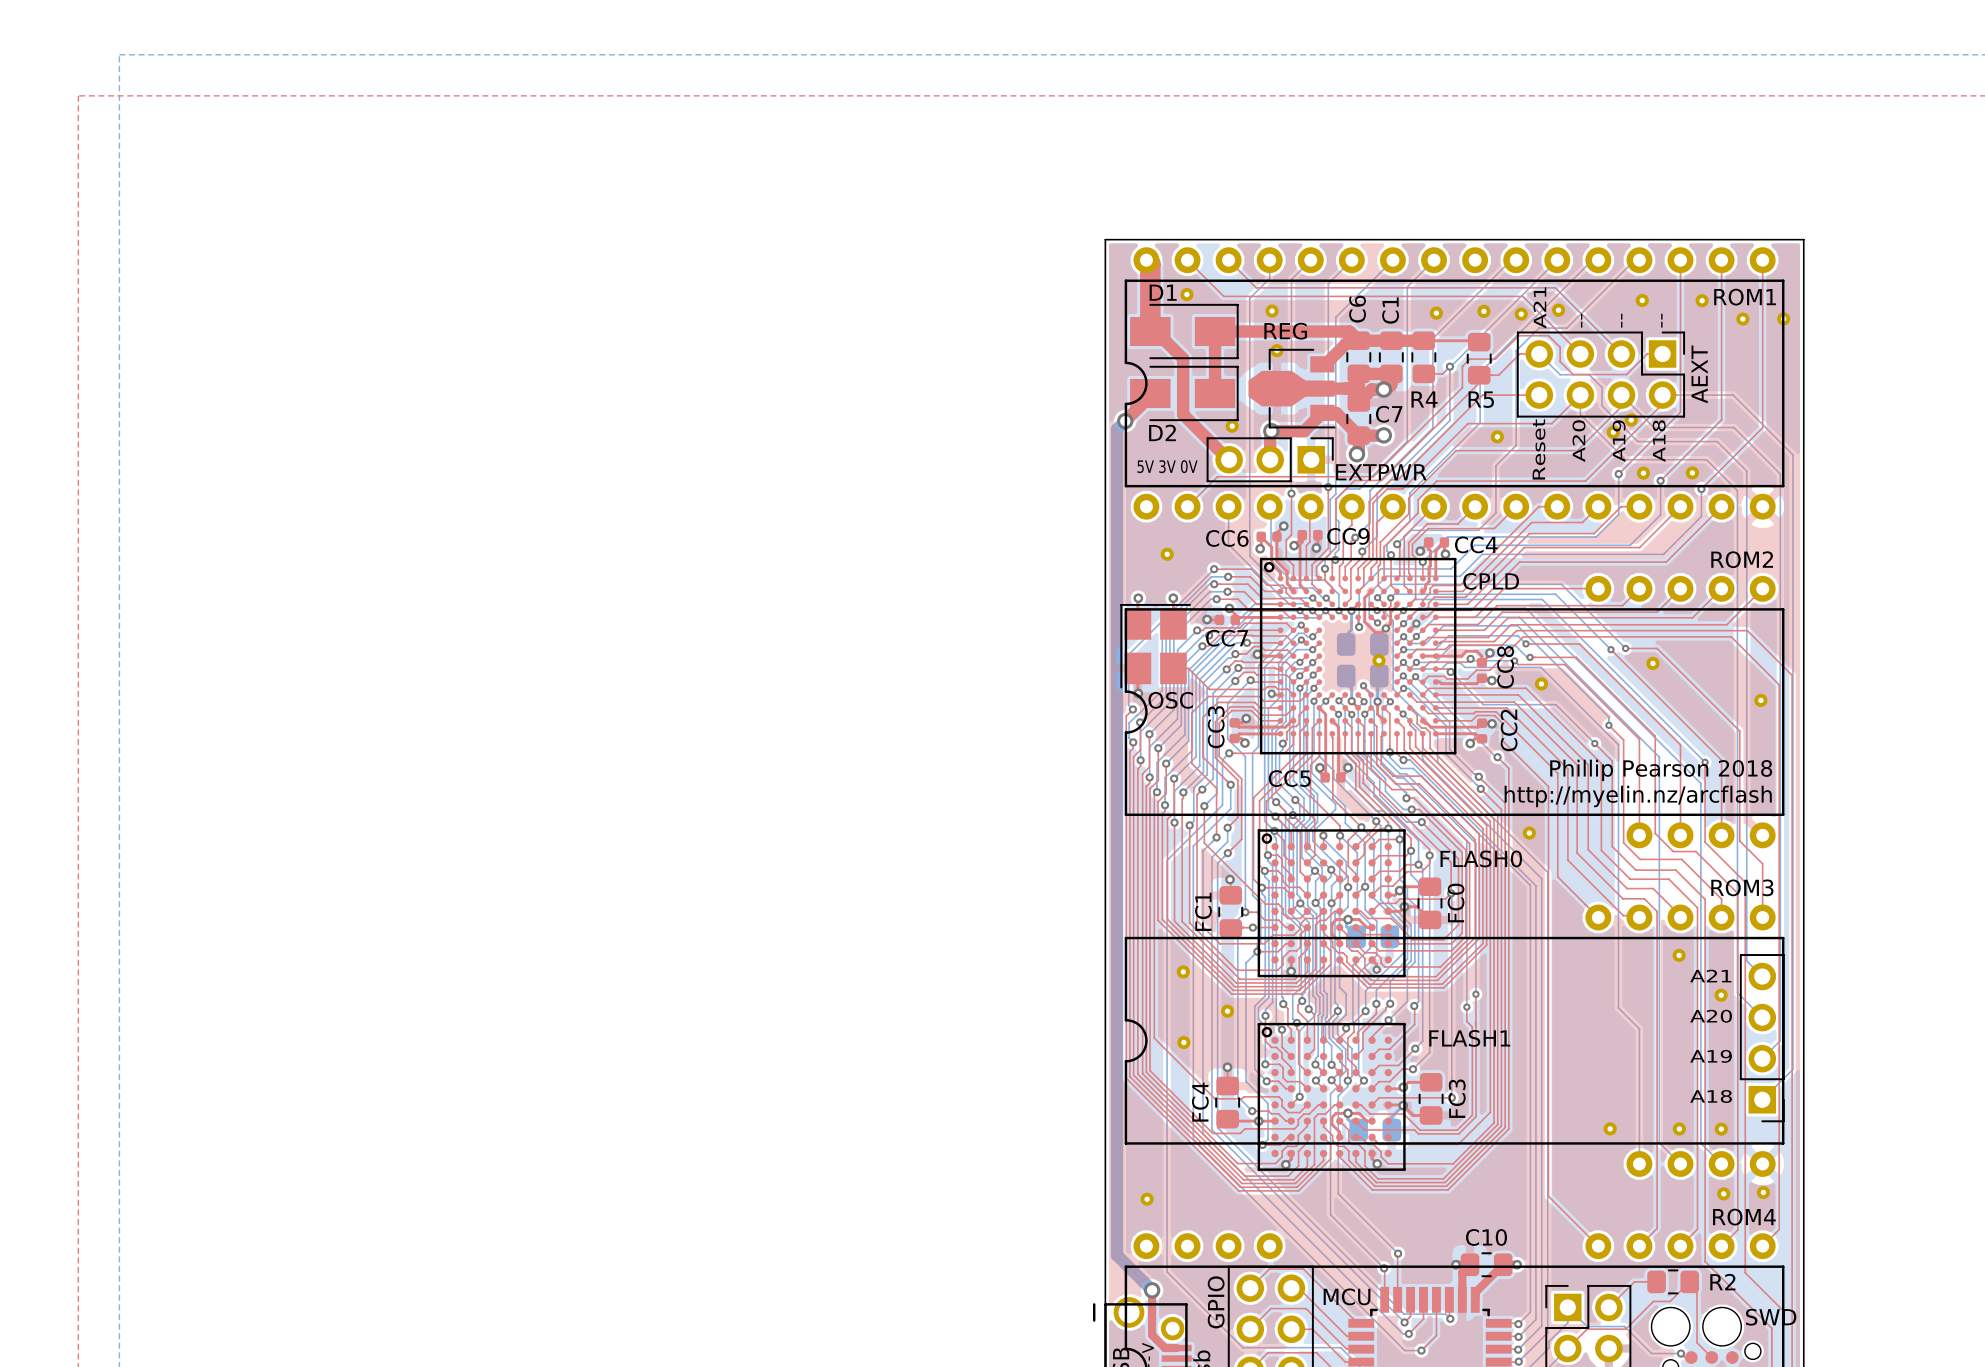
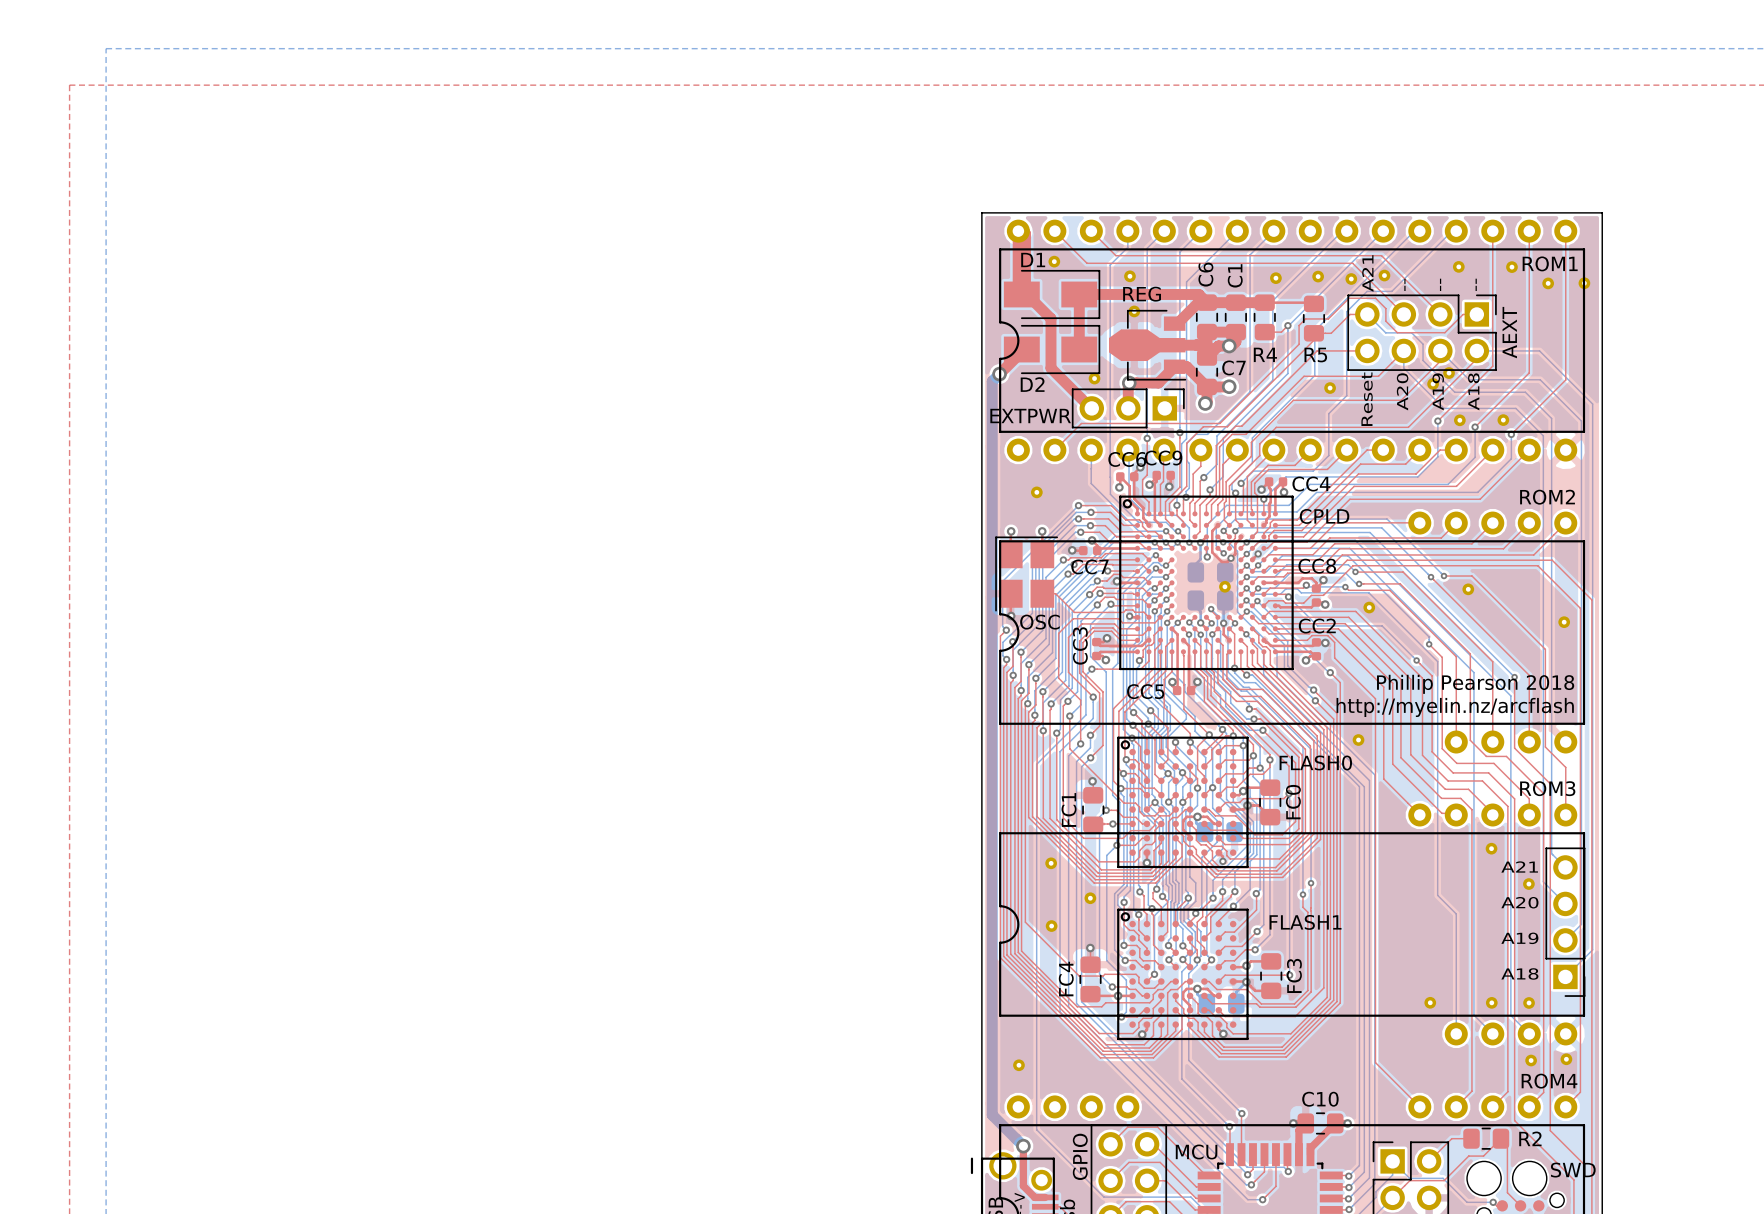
text: 5V 3V 0V (1167, 466) -> none
EXTPWR name position: EXTPWR (1381, 472) -> EXTPWR (1030, 416)
CC9 name position: CC9 (1348, 536) -> CC9 (1163, 458)
CC6 name position: CC6 (1227, 538) -> CC6 (1127, 459)
CC8 name rotation: 0° (1505, 667) -> 90° clockwise (1317, 566)
CC2 name rotation: 0° (1509, 730) -> 90° clockwise (1317, 626)

